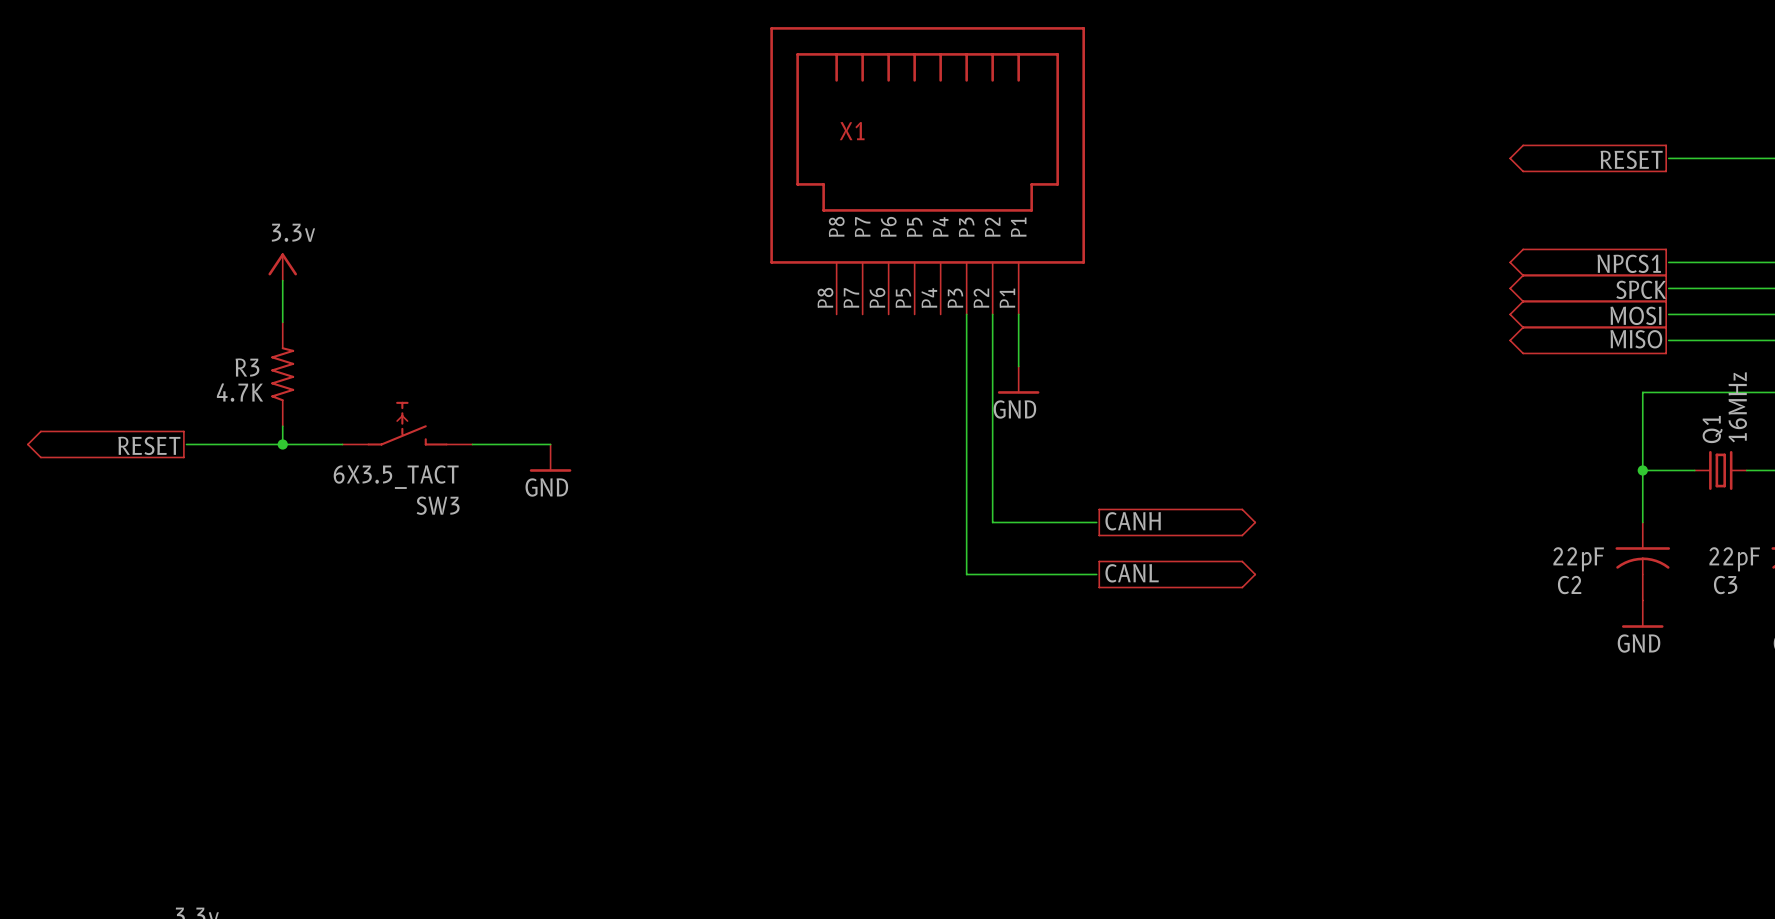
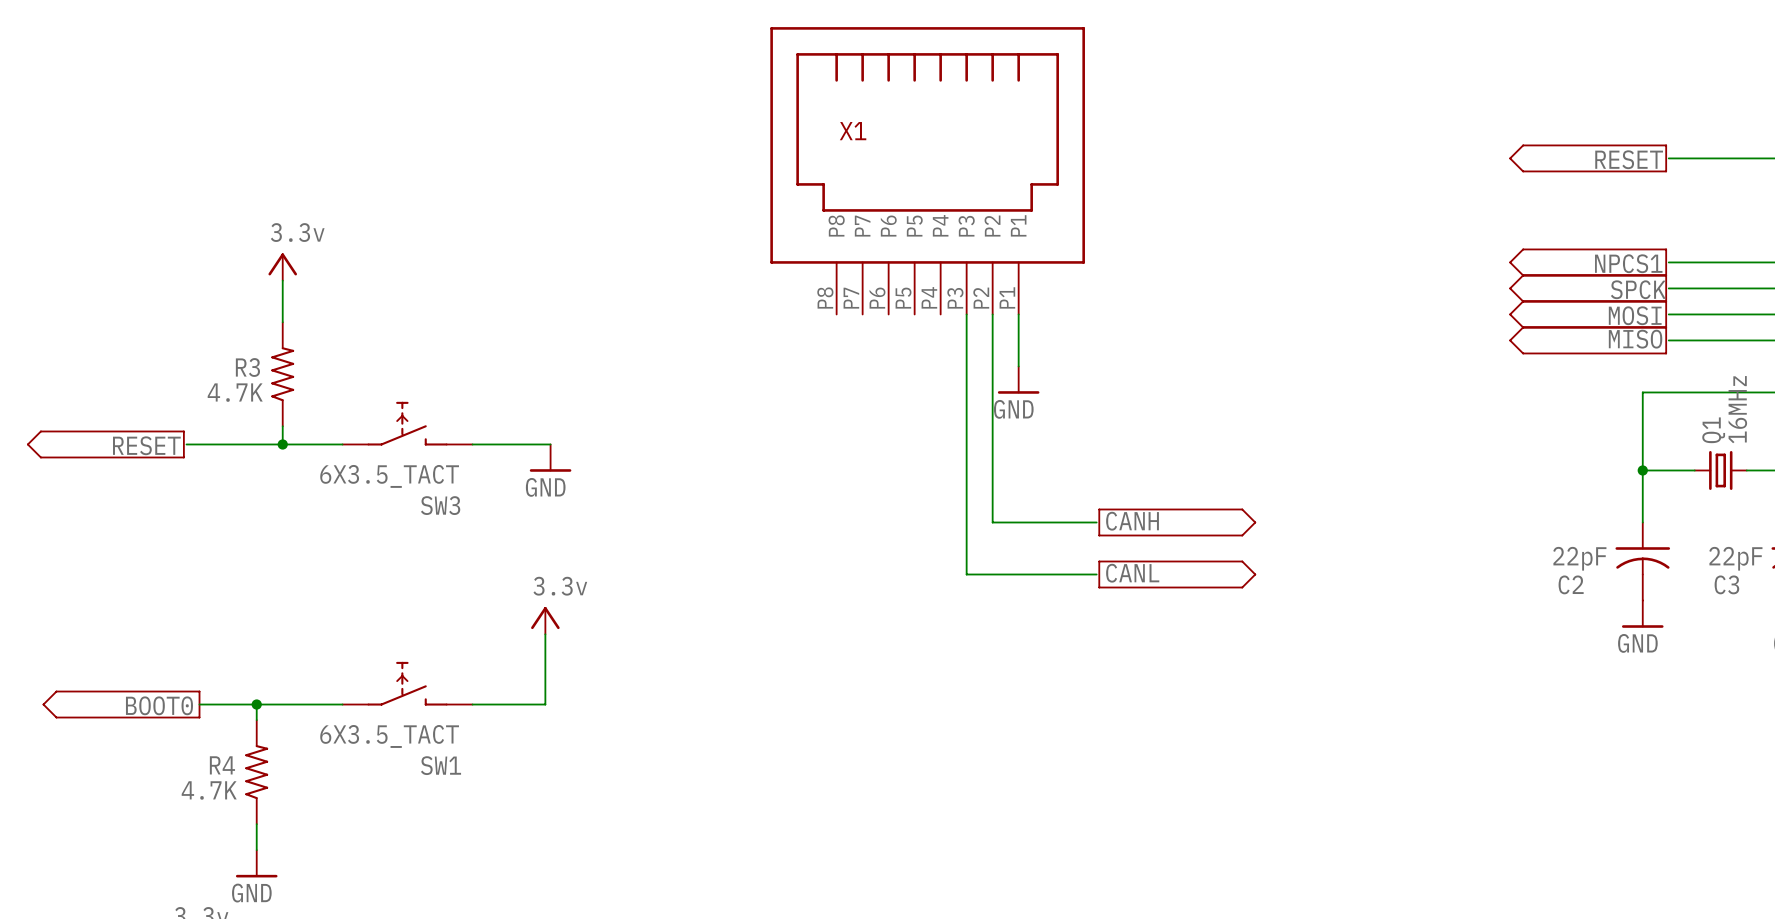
power symbol: none -> 3.3v (545, 620)
wire: none -> (545, 634) (545, 704) (472, 704)
SW1: none -> 6X3.5_TACT (407, 683)
part: none -> (121, 704)
wire: none -> (199, 704) (342, 704)
wire: none -> (256, 704) (256, 720)
junction: none -> (256, 704)
label: none -> BOOT0 (159, 705)
R4: none -> 4.7K (256, 772)
wire: none -> (256, 824) (256, 850)
power symbol: none -> GND (256, 863)

